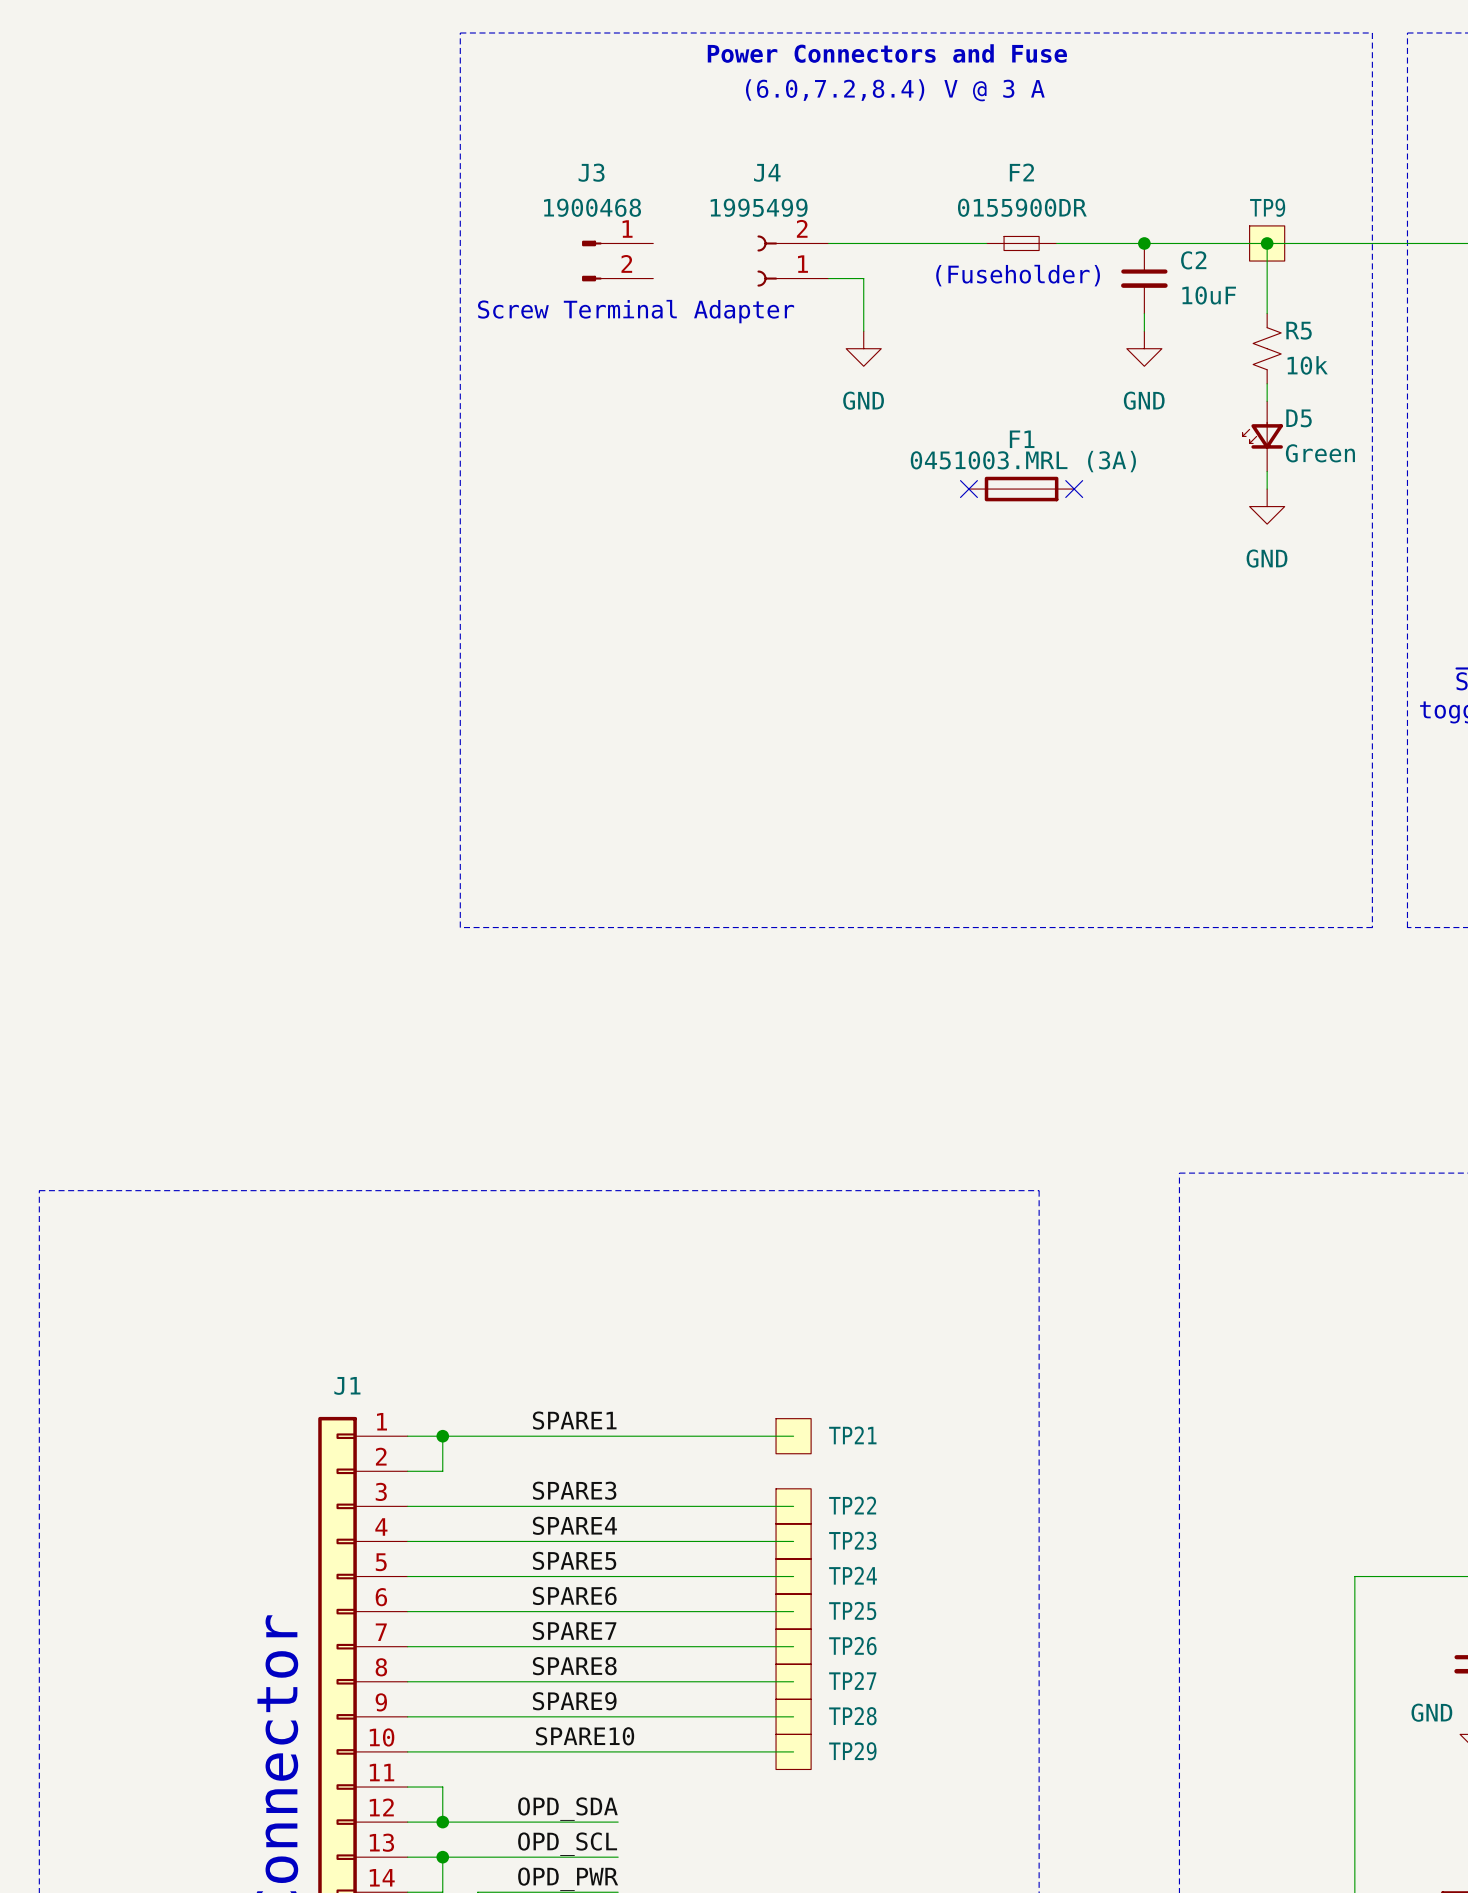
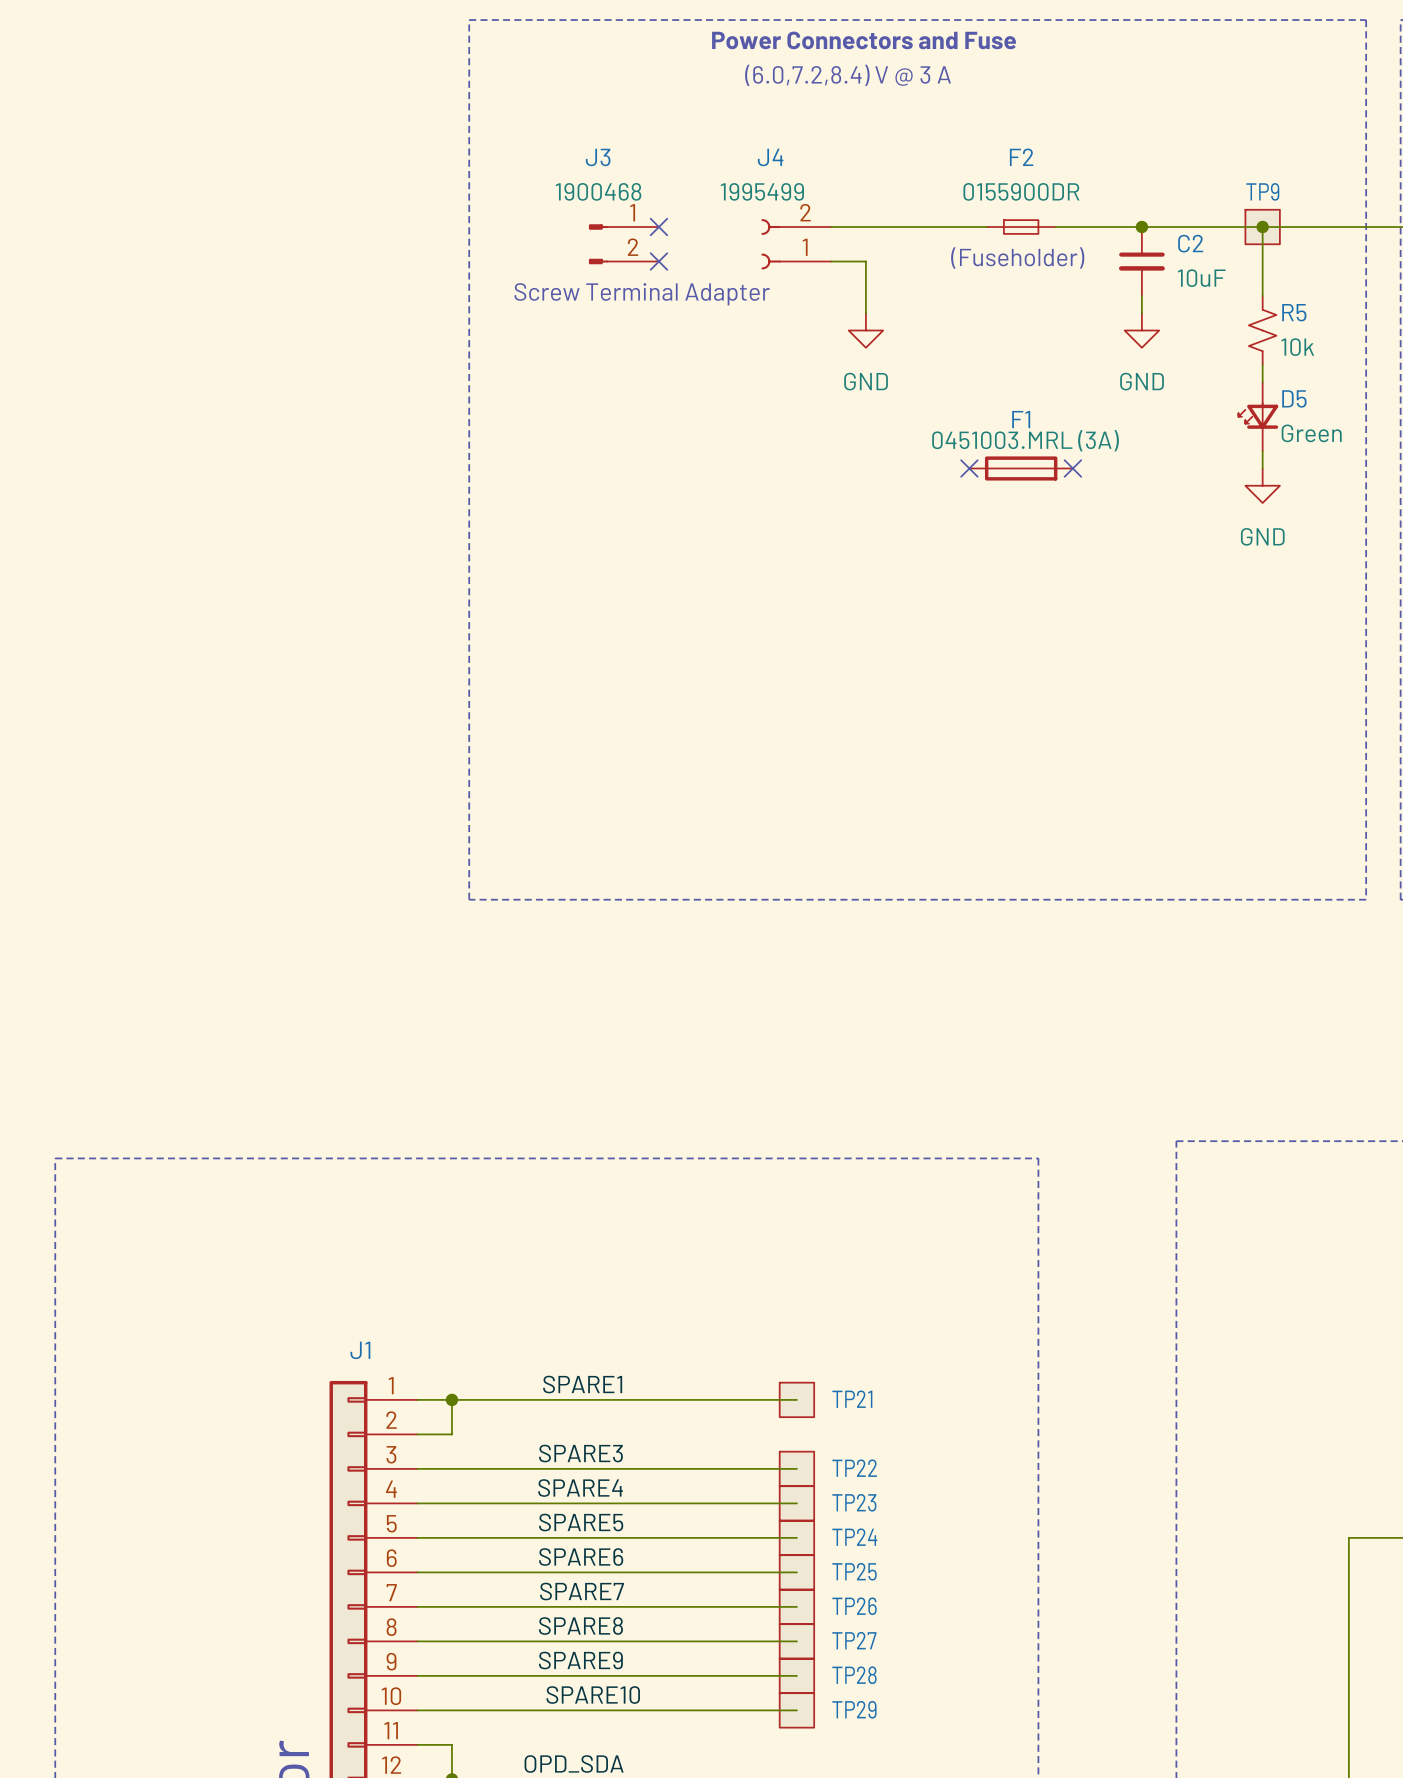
no-connect mark: none -> (658, 227)
no-connect mark: none -> (658, 261)

